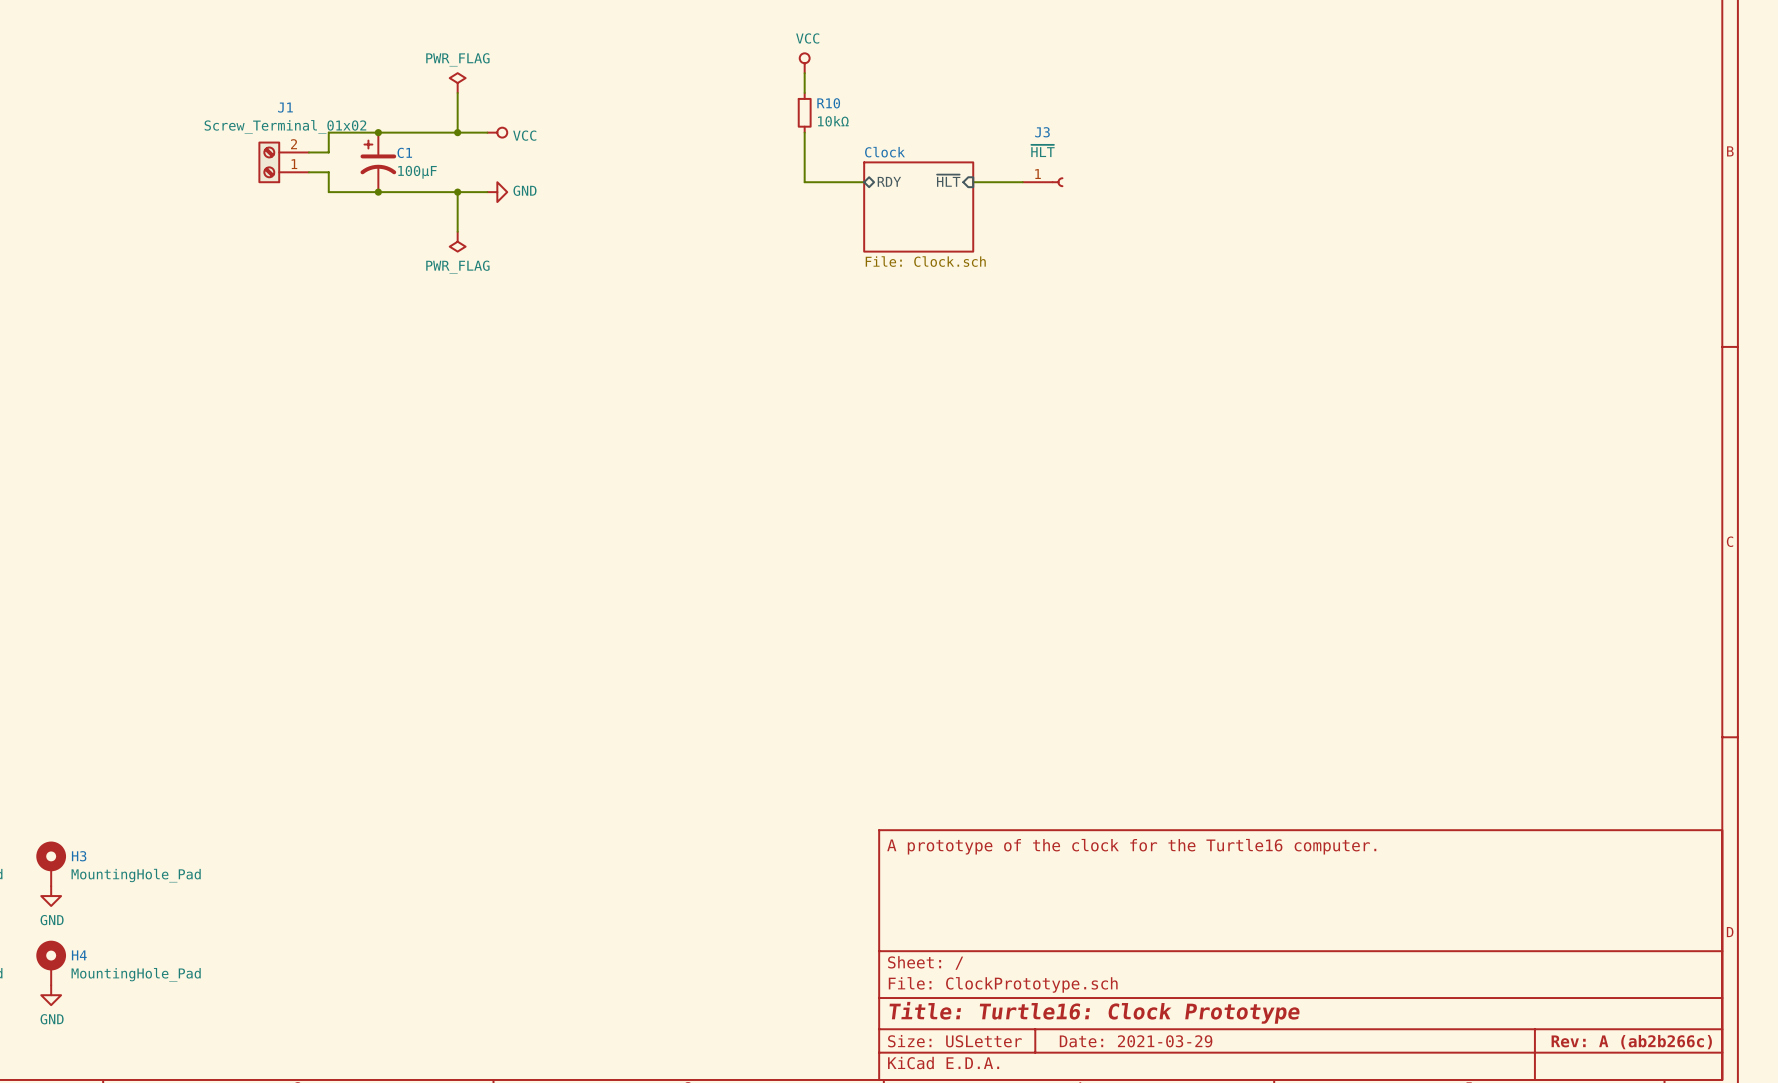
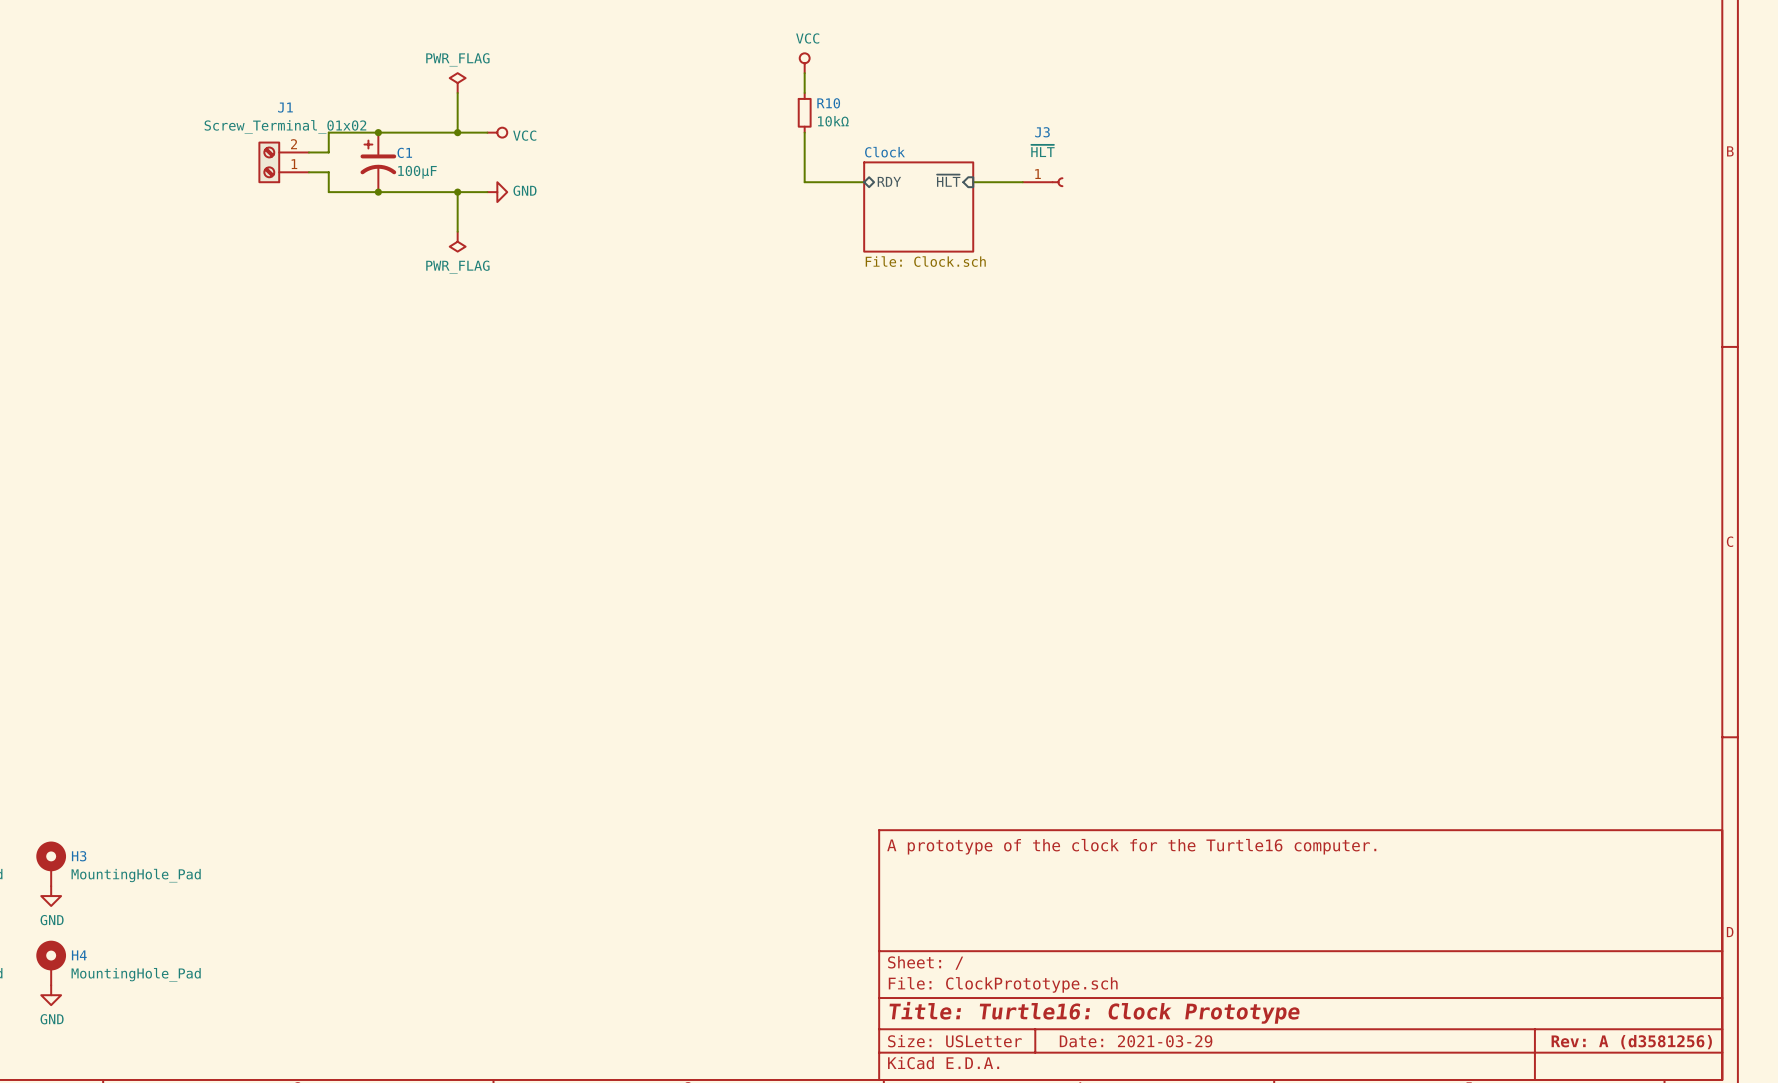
title block: Rev: A (ab2b266c) (1631, 1042) -> Rev: A (d3581256) (1631, 1042)

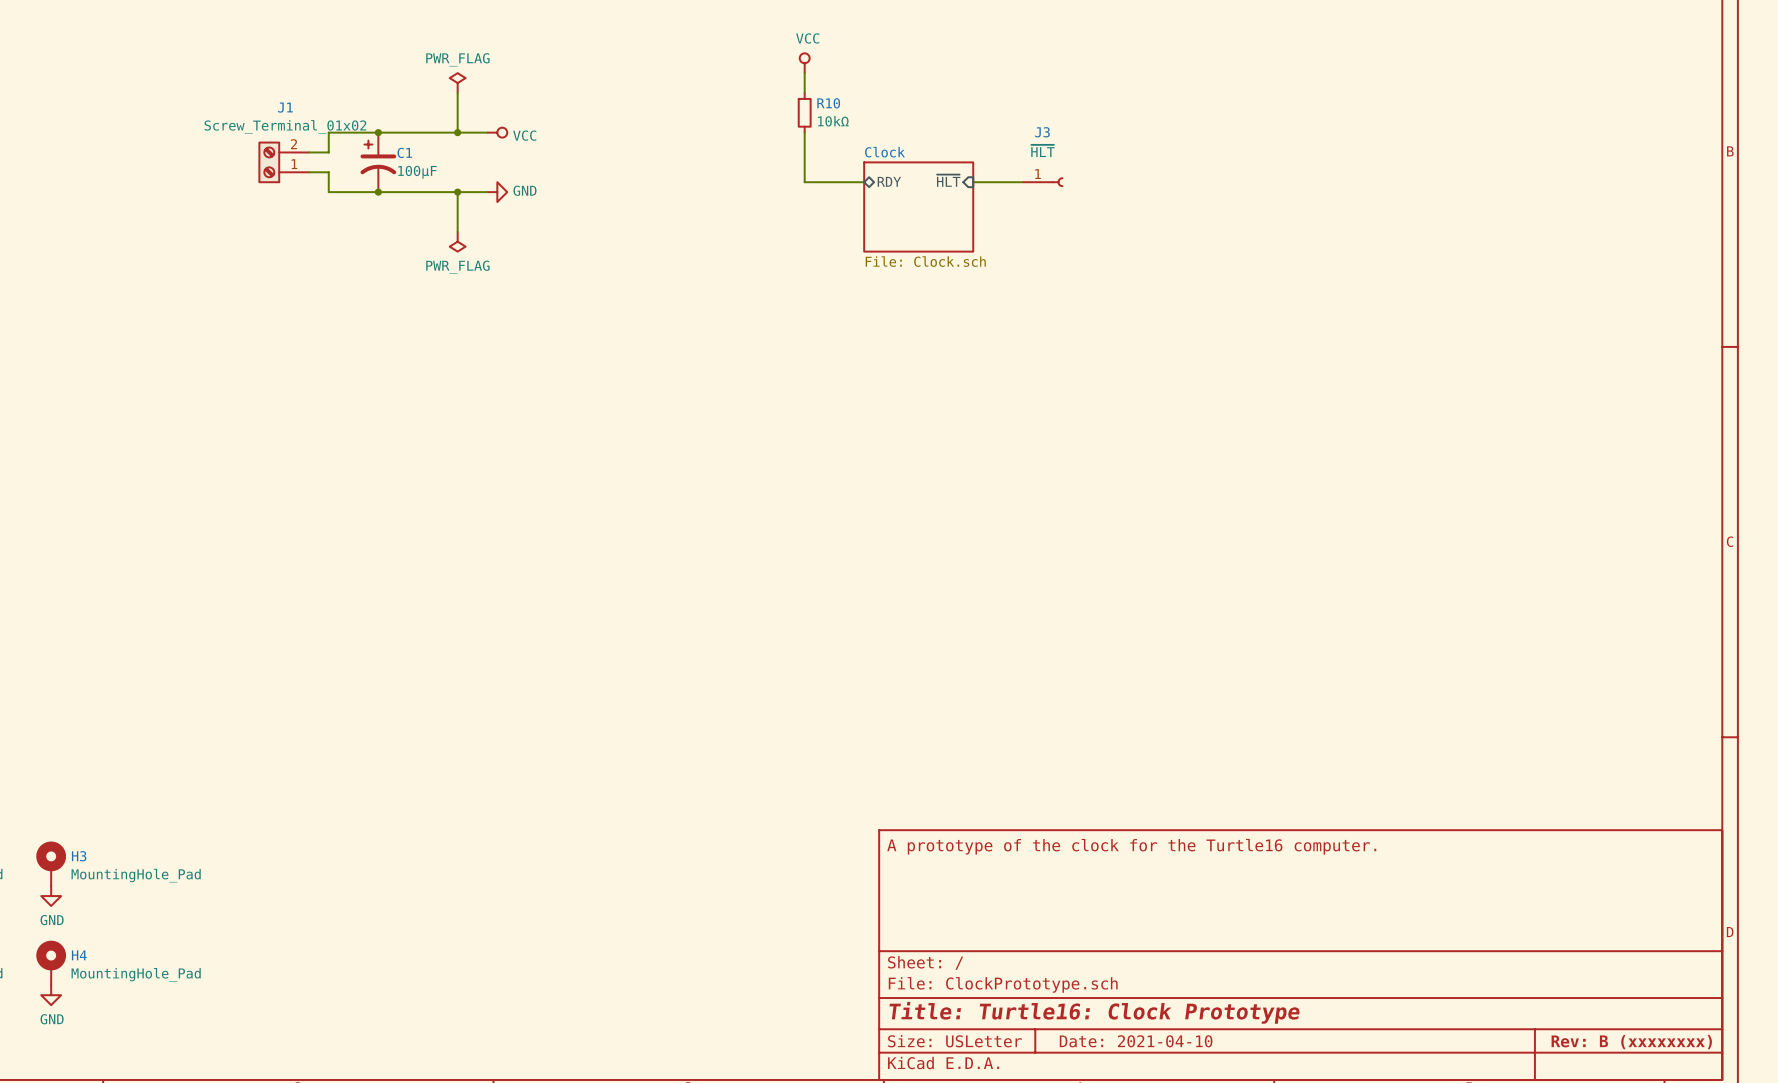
title block: Date: 2021-03-29 (1136, 1041) -> Date: 2021-04-10 (1136, 1041)
title block: Rev: A (d3581256) (1631, 1042) -> Rev: B (xxxxxxxx) (1631, 1042)

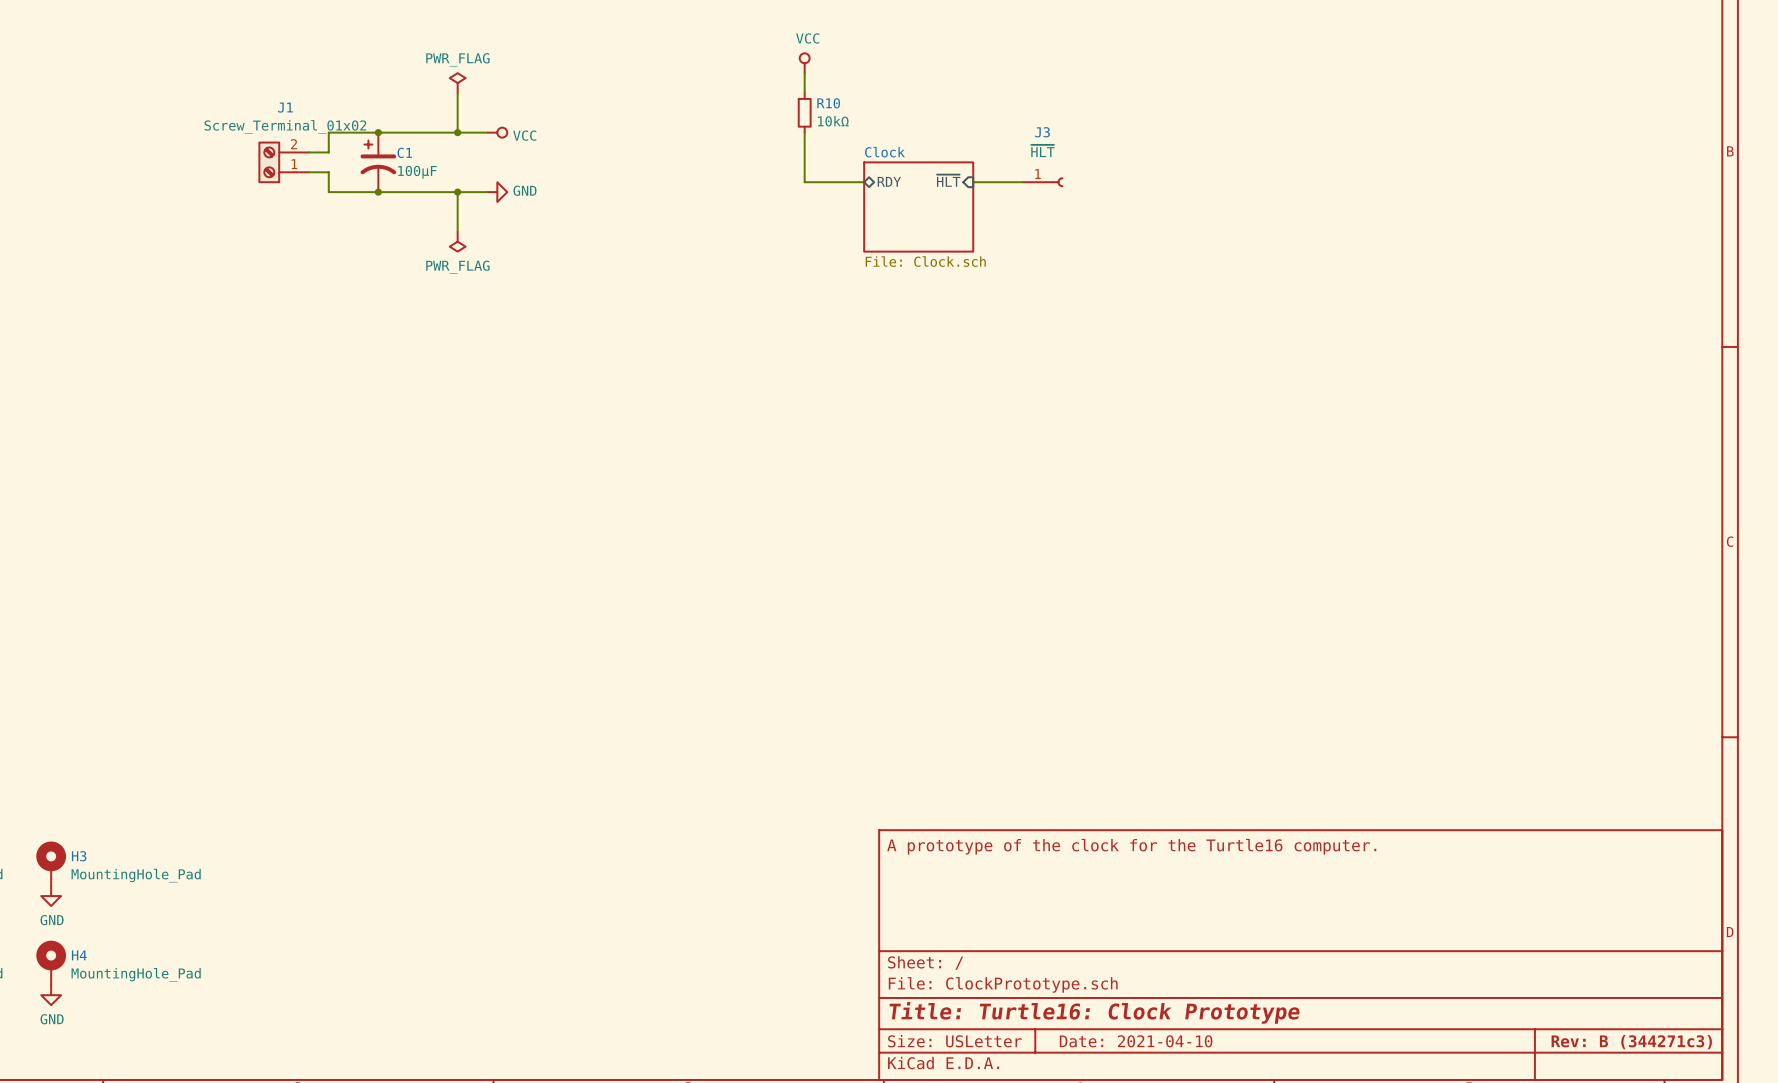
title block: Rev: B (xxxxxxxx) (1631, 1042) -> Rev: B (344271c3) (1631, 1042)

